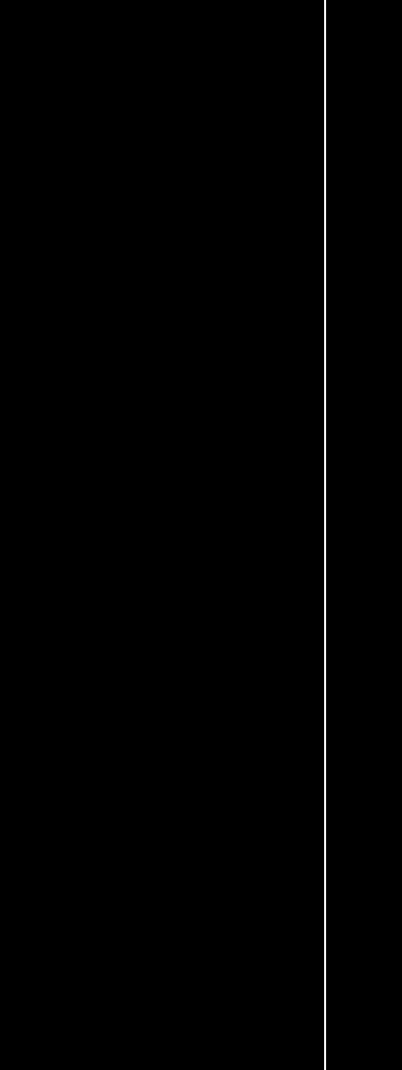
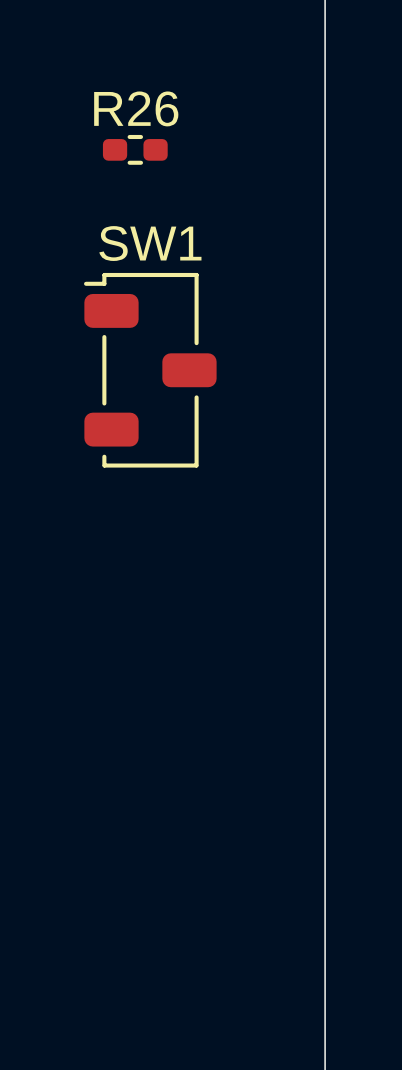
R26: none -> (135, 149)
SW1: none -> (150, 370)

